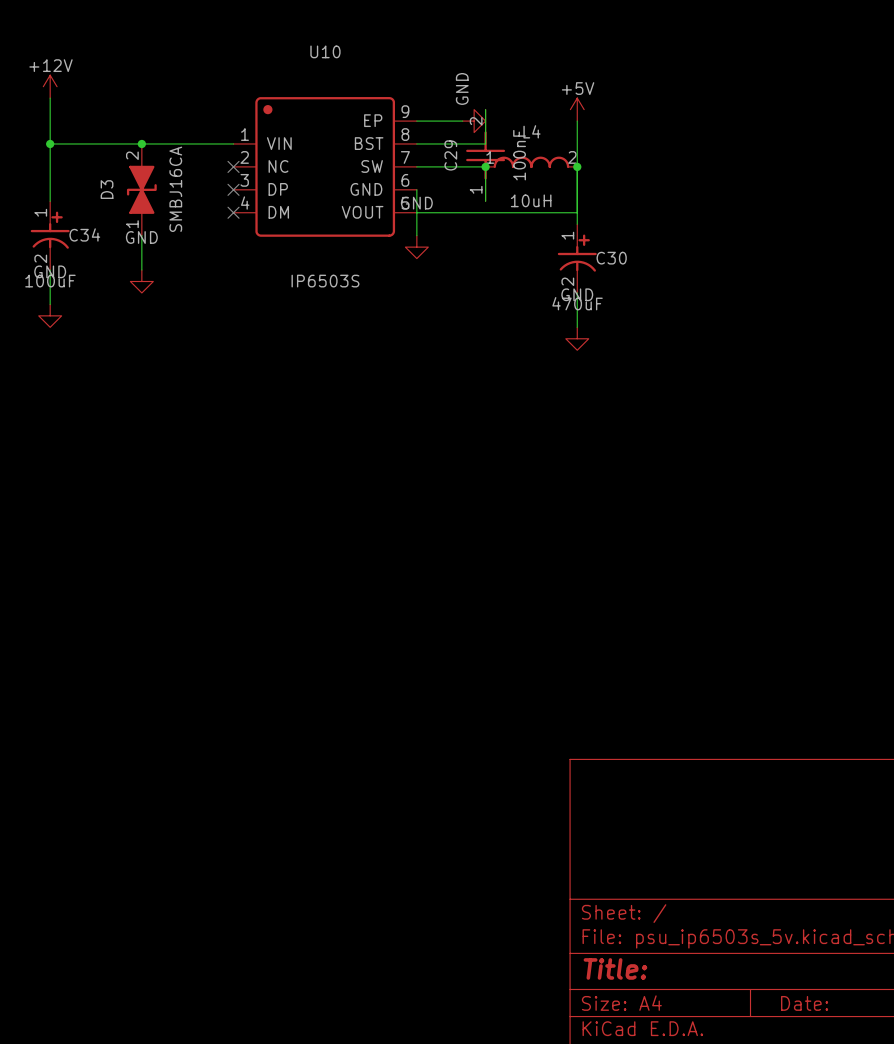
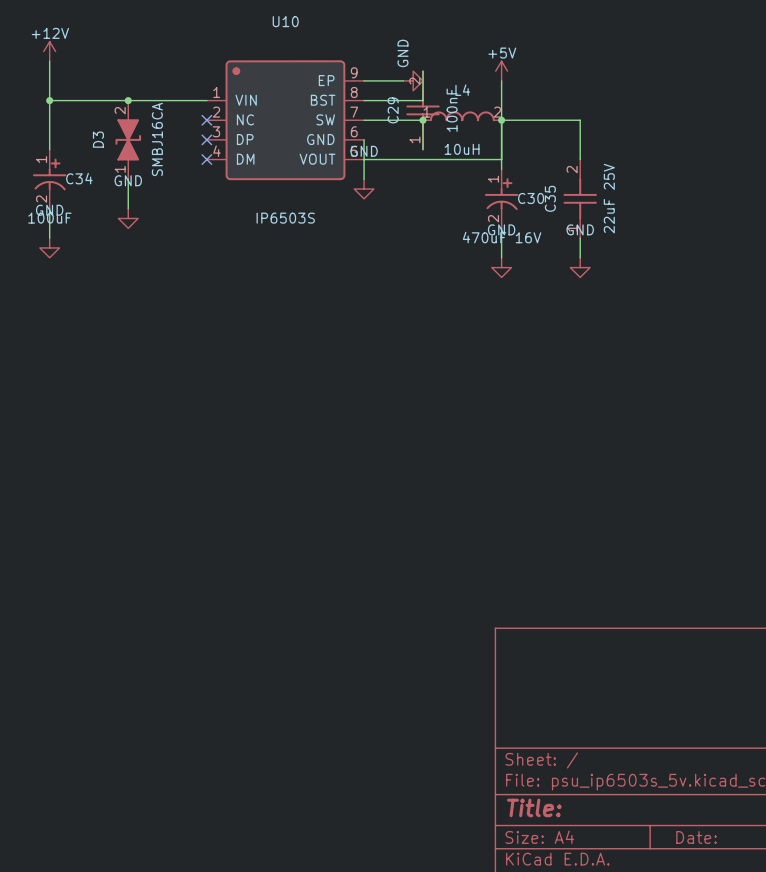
wire: none -> (501, 120) (580, 120) (580, 159)
C35: none -> 22uF 25V (580, 198)
C30 value: 470uF (577, 303) -> 470uF 16V (502, 237)
wire: none -> (580, 238) (580, 257)
power symbol: none -> GND (580, 267)

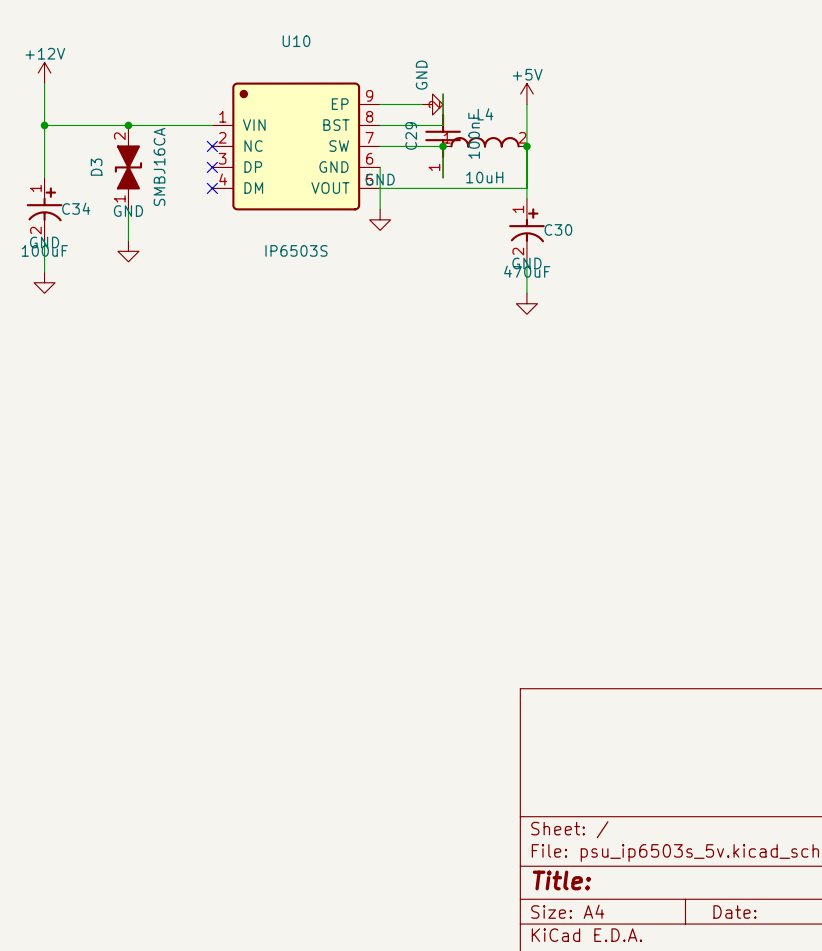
wire: (501, 120) (580, 120) (580, 159) -> none
C35: 22uF 25V (580, 198) -> none
C30 value: 470uF 16V (502, 237) -> 470uF (527, 271)
wire: (580, 238) (580, 257) -> none
power symbol: GND (580, 267) -> none

